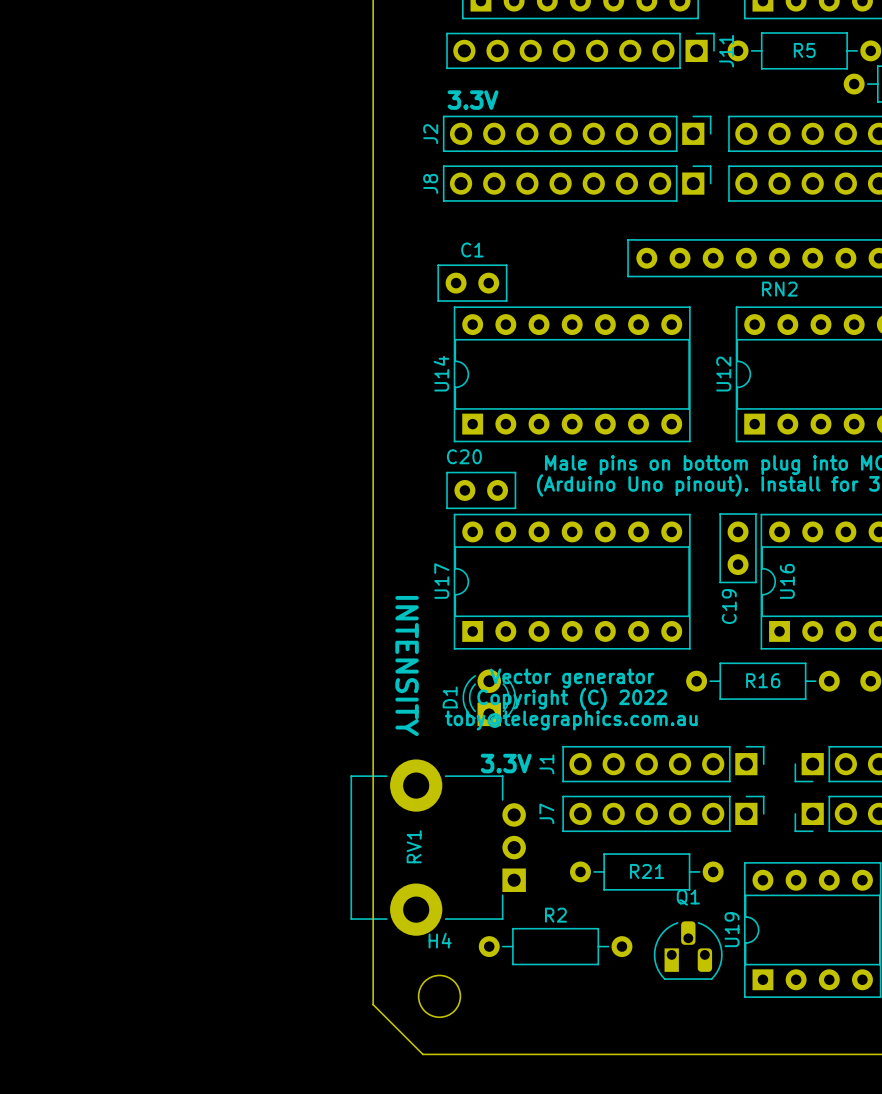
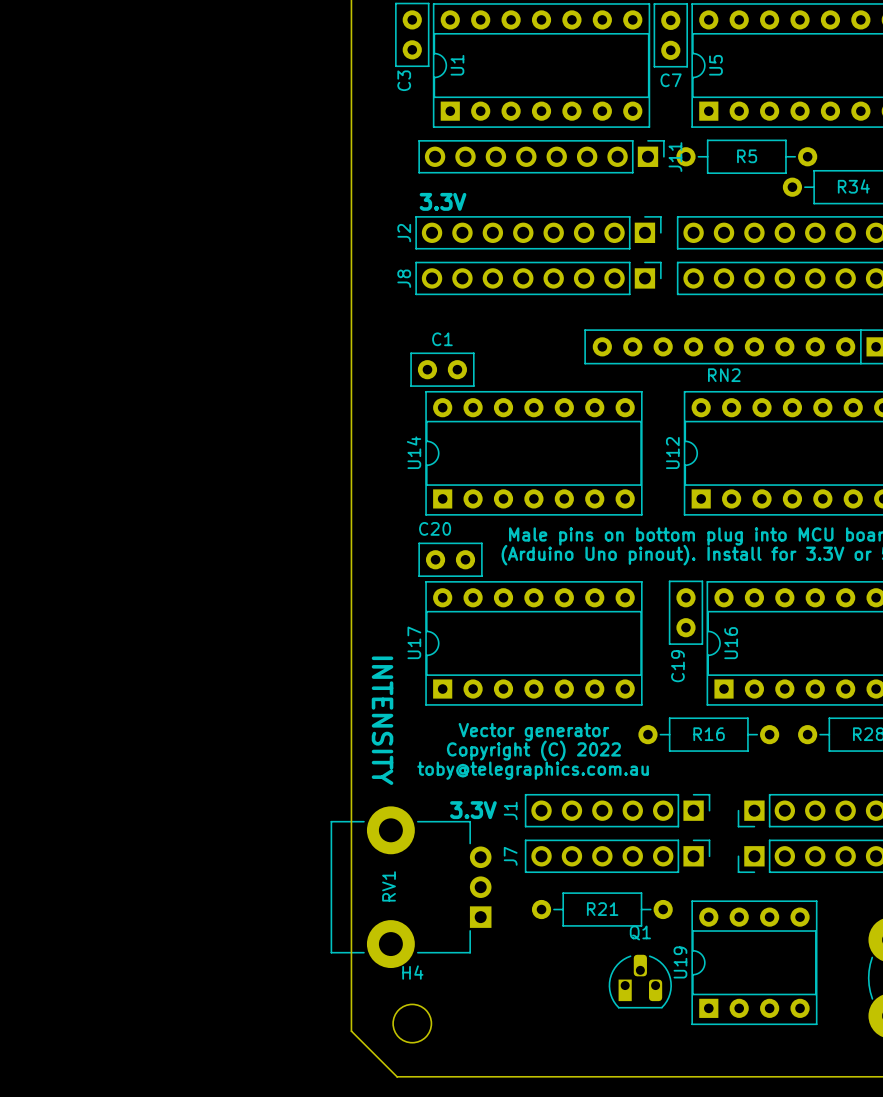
D1: (489, 697) -> none
R2: (555, 946) -> none

